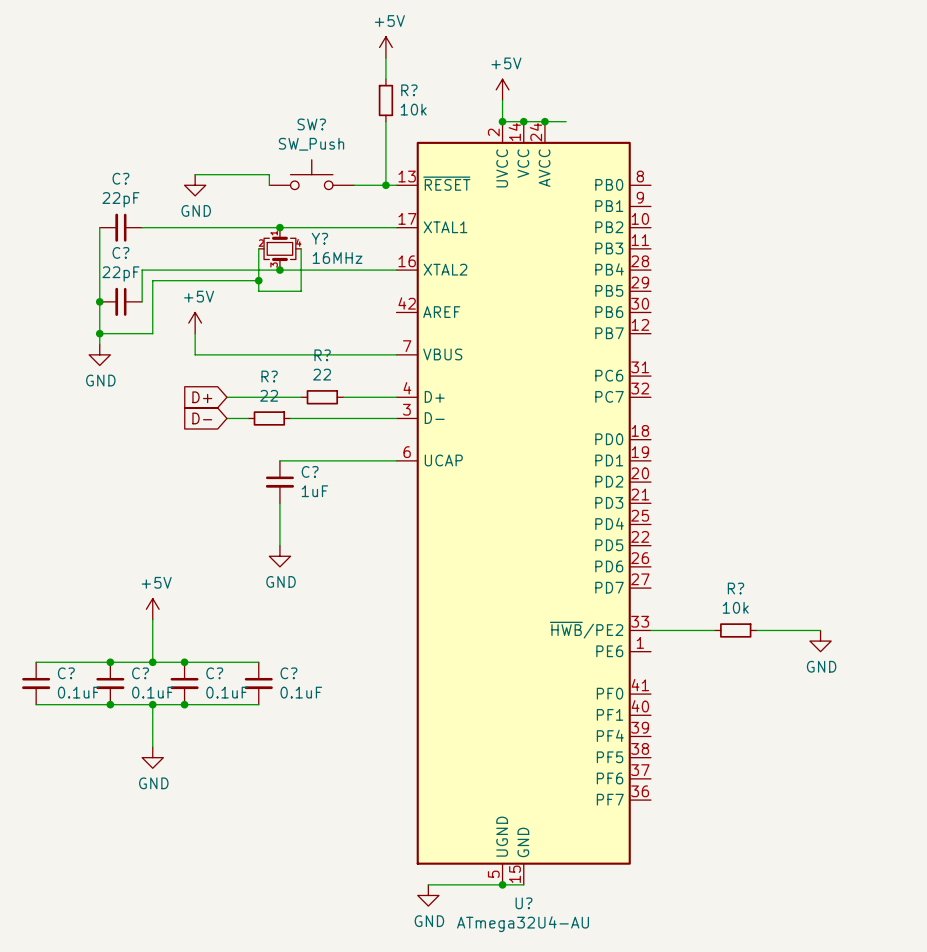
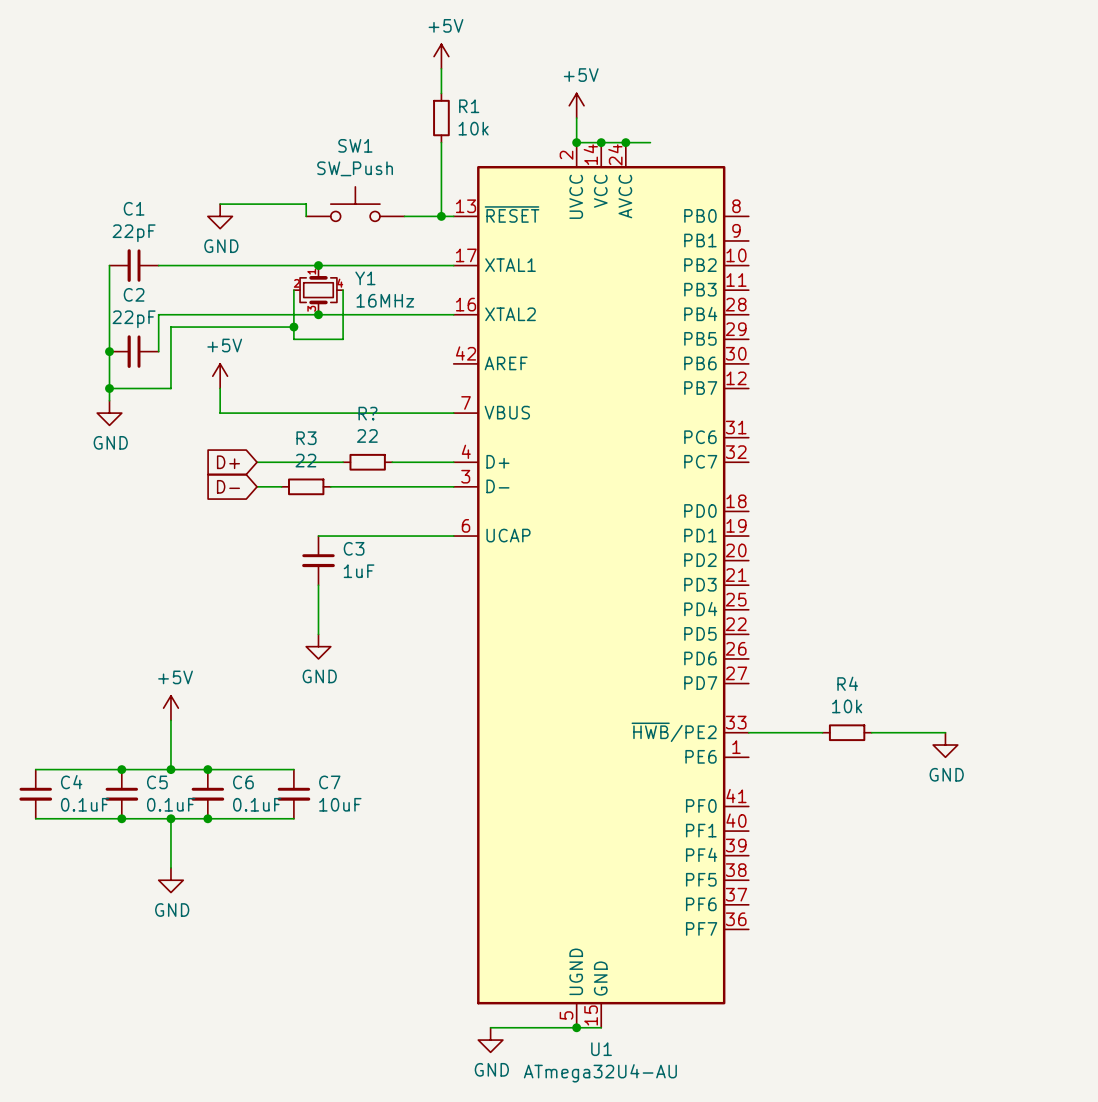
R? name: R? (409, 90) -> R1 (469, 106)
SW? name: SW? (311, 124) -> SW1 (355, 145)
C? name: C? (120, 178) -> C1 (134, 208)
Y? name: Y? (319, 238) -> Y1 (365, 278)
C? name: C? (120, 252) -> C2 (134, 294)
R? name: R? (269, 376) -> R3 (306, 438)
C? name: C? (310, 471) -> C3 (354, 548)
R? name: R? (736, 588) -> R4 (847, 683)
C? name: C? (66, 673) -> C4 (71, 782)
C? name: C? (140, 673) -> C5 (157, 782)
C? name: C? (214, 673) -> C6 (243, 782)
C? name: C? (288, 673) -> C7 (329, 782)
C? value: 0.1uF (301, 692) -> 10uF (340, 804)
U? name: U? (524, 903) -> U1 (601, 1049)

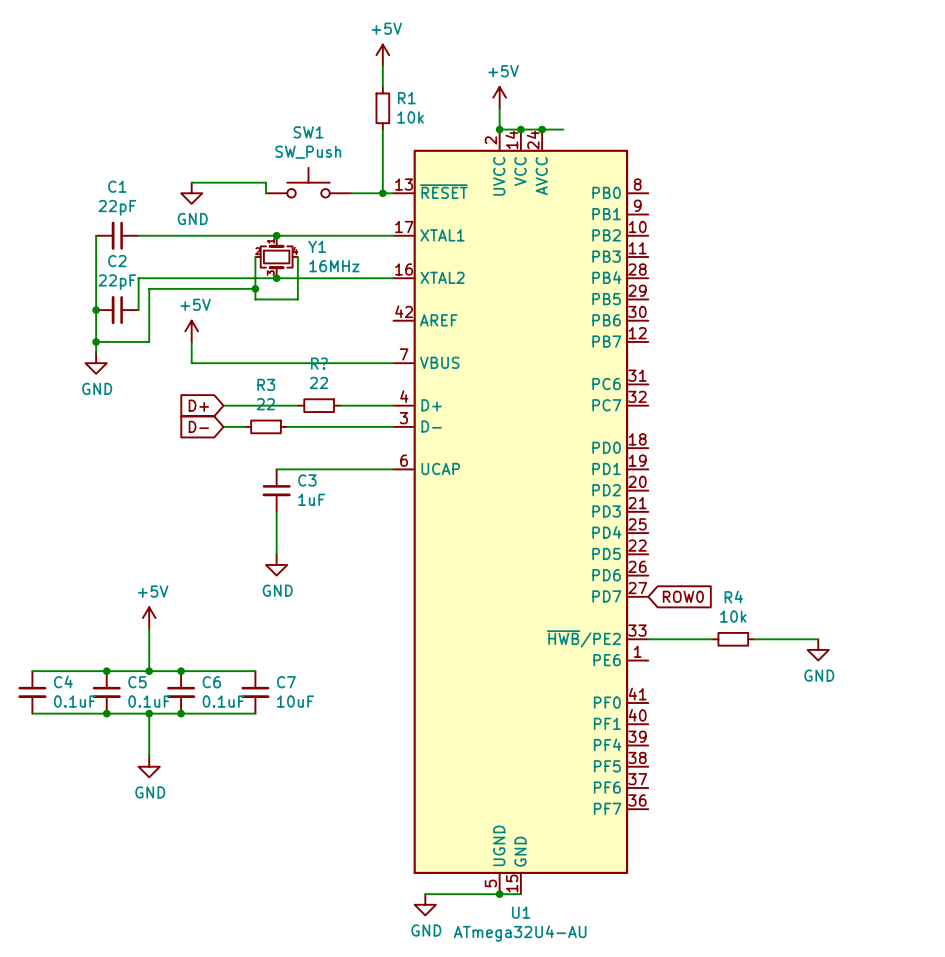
global label: none -> ROW0 (683, 596)

